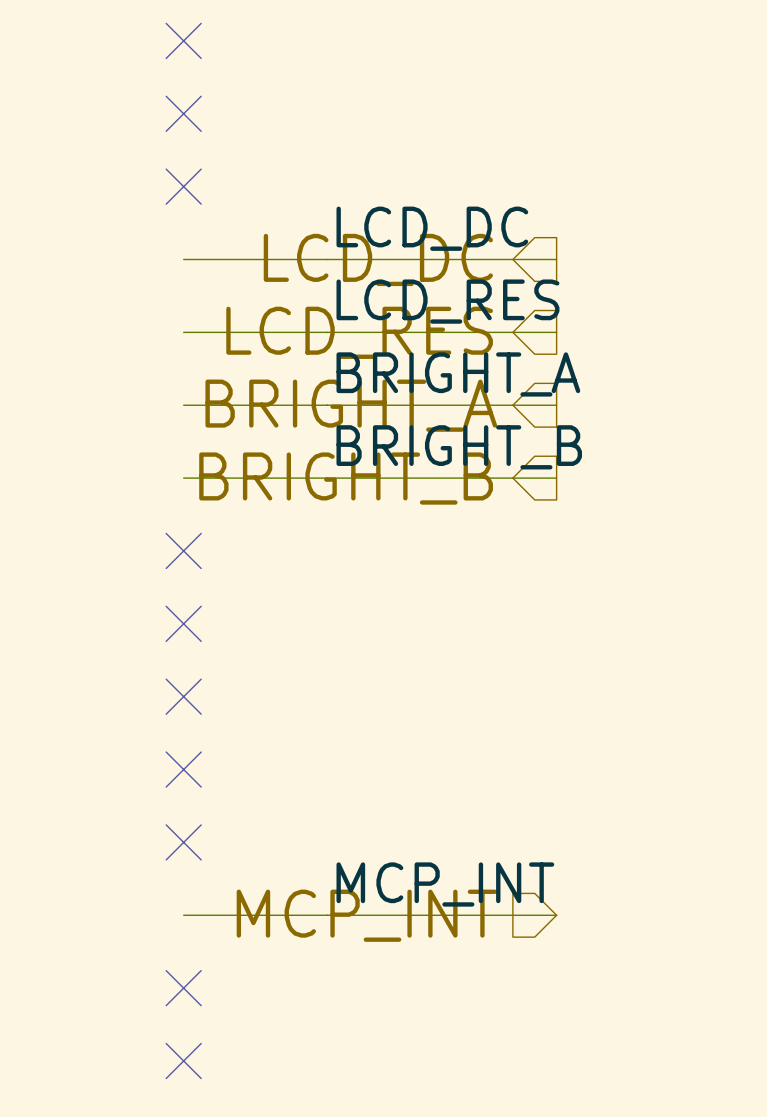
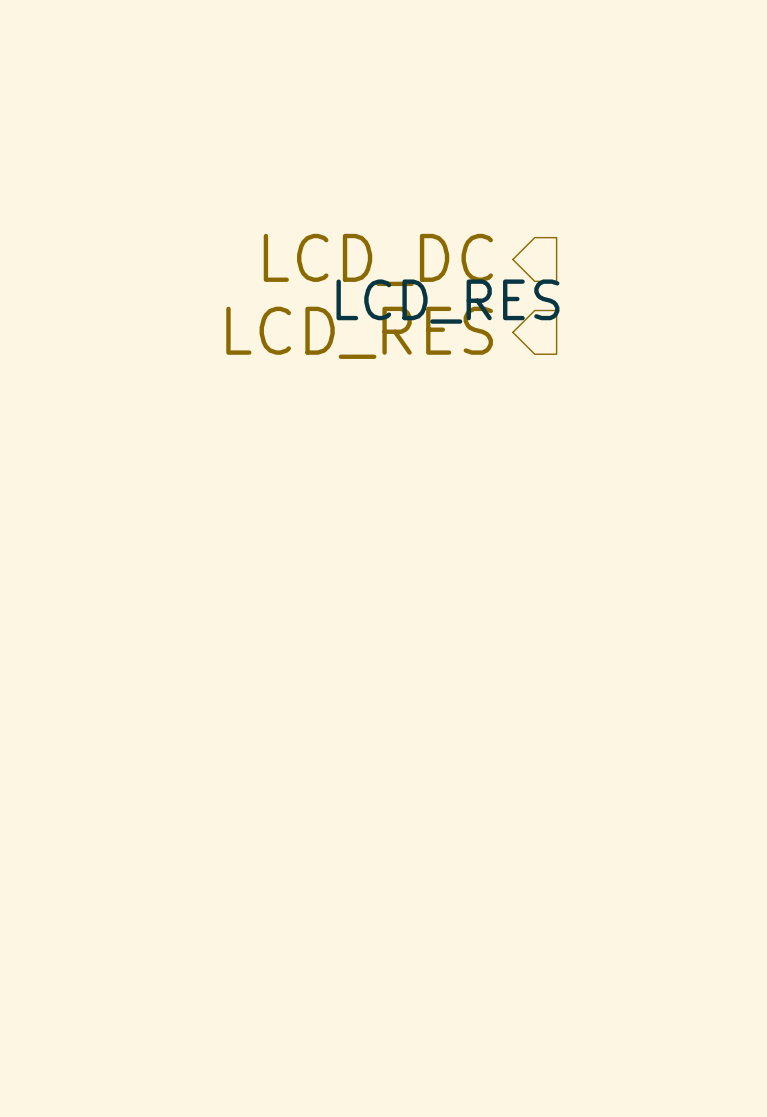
no-connect mark: (183, 40) -> none
no-connect mark: (183, 113) -> none
no-connect mark: (183, 186) -> none
label: LCD_DC (432, 228) -> none
wire: (183, 259) (556, 259) -> none
wire: (183, 332) (556, 332) -> none
label: BRIGHT_A (458, 374) -> none
wire: (183, 405) (556, 405) -> none
hierarchical label: BRIGHT_A (351, 405) -> none
label: BRIGHT_B (459, 447) -> none
wire: (183, 478) (556, 478) -> none
hierarchical label: BRIGHT_B (346, 478) -> none
no-connect mark: (183, 550) -> none
no-connect mark: (183, 623) -> none
no-connect mark: (183, 696) -> none
no-connect mark: (183, 769) -> none
no-connect mark: (183, 842) -> none
label: MCP_INT (445, 884) -> none
wire: (183, 915) (556, 915) -> none
hierarchical label: MCP_INT (366, 915) -> none
no-connect mark: (183, 988) -> none
no-connect mark: (183, 1061) -> none

